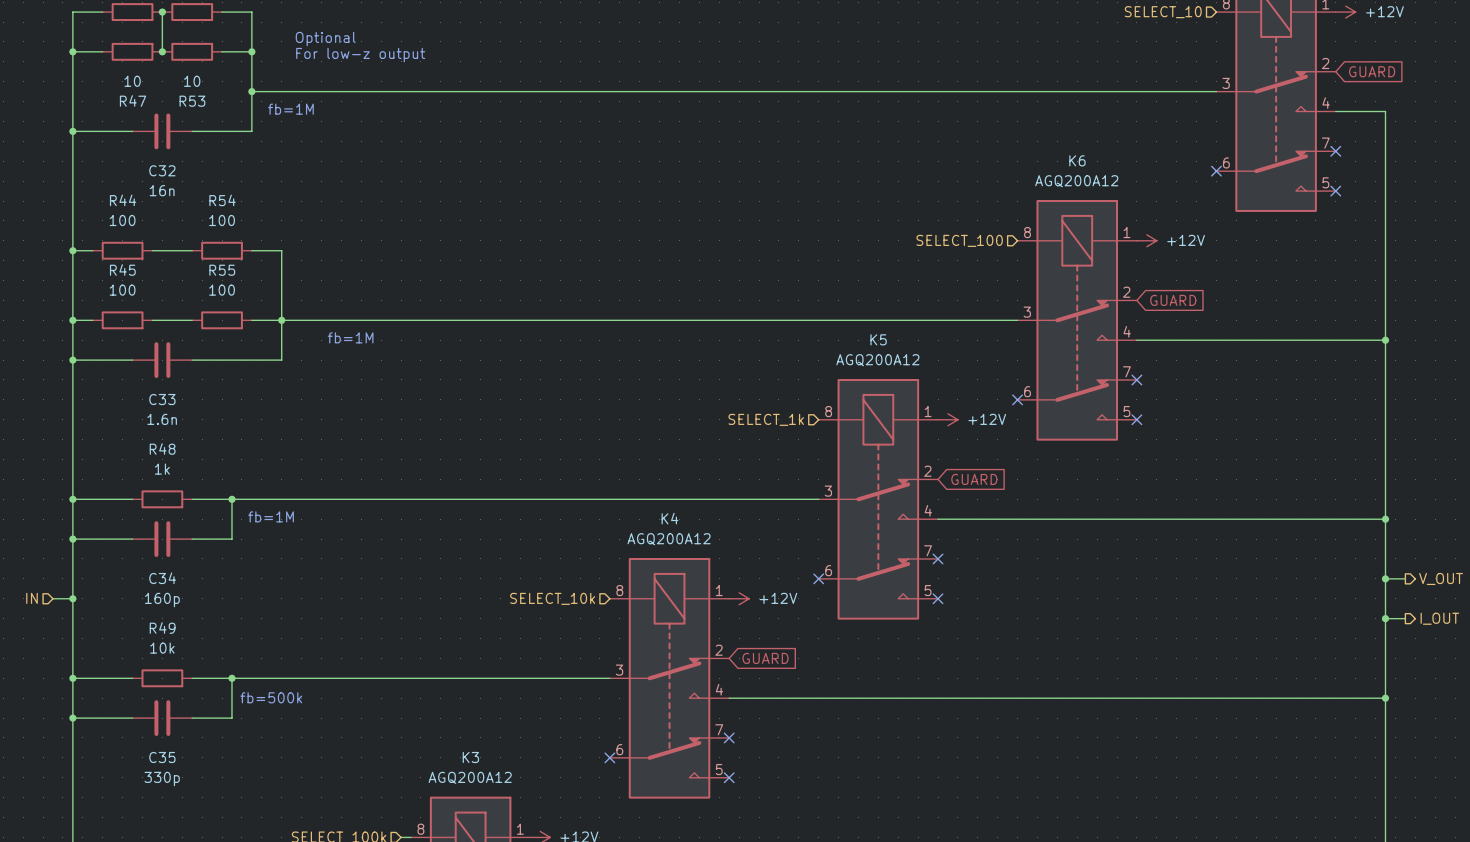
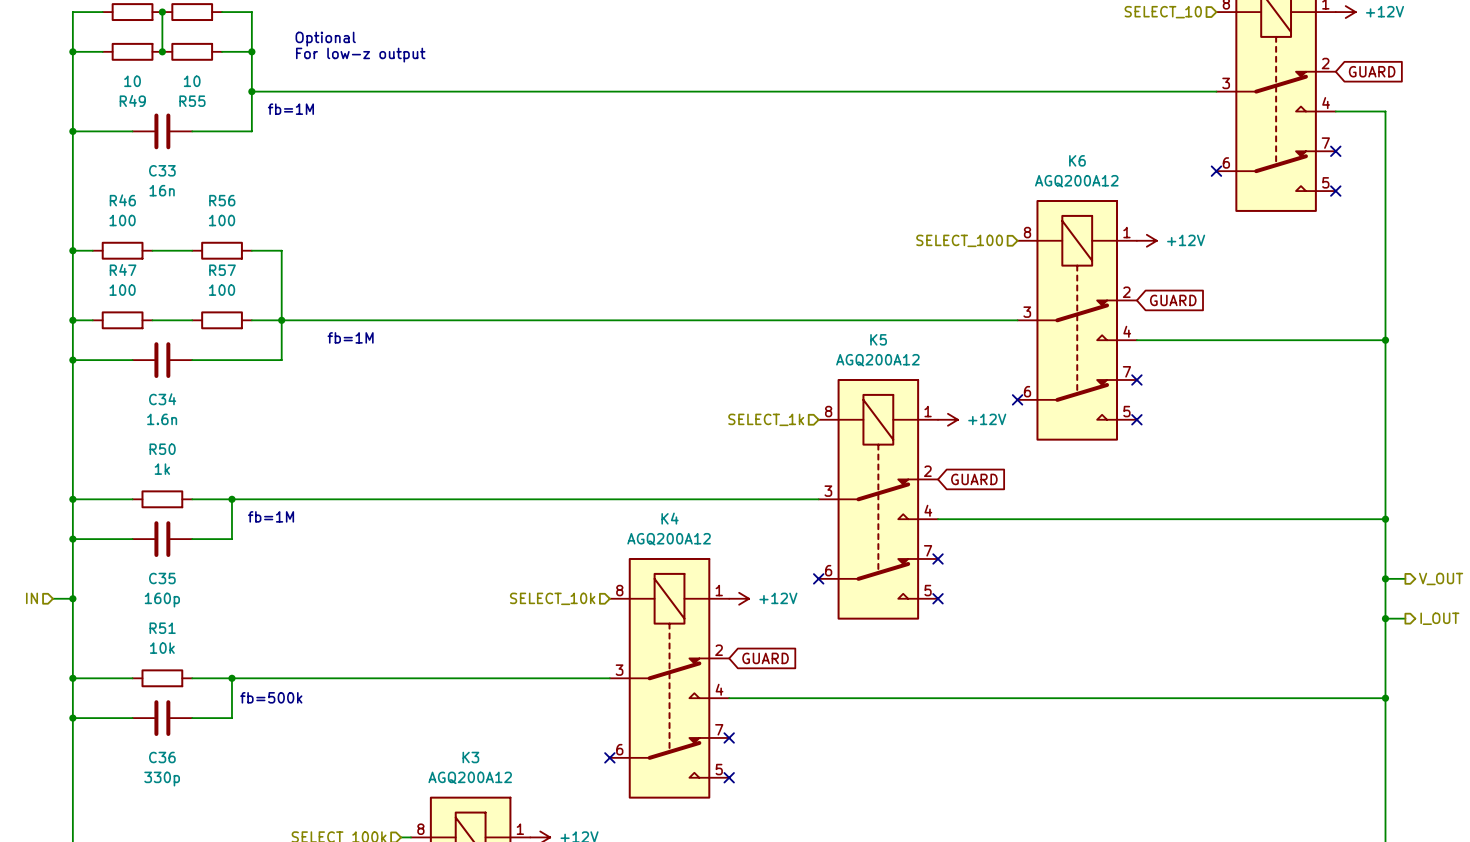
R47 name: R47 (133, 100) -> R49 (132, 100)
R53 name: R53 (192, 101) -> R55 (192, 101)
C32 name: C32 (162, 170) -> C33 (162, 170)
R44 name: R44 (123, 200) -> R46 (122, 200)
R54 name: R54 (222, 200) -> R56 (222, 200)
R45 name: R45 (122, 270) -> R47 (123, 270)
R55 name: R55 (222, 270) -> R57 (222, 270)
C33 name: C33 (162, 399) -> C34 (162, 399)
R48 name: R48 (162, 448) -> R50 (162, 449)
C34 name: C34 (162, 578) -> C35 (162, 578)
R49 name: R49 (162, 627) -> R51 (162, 628)
C35 name: C35 (162, 757) -> C36 (162, 757)

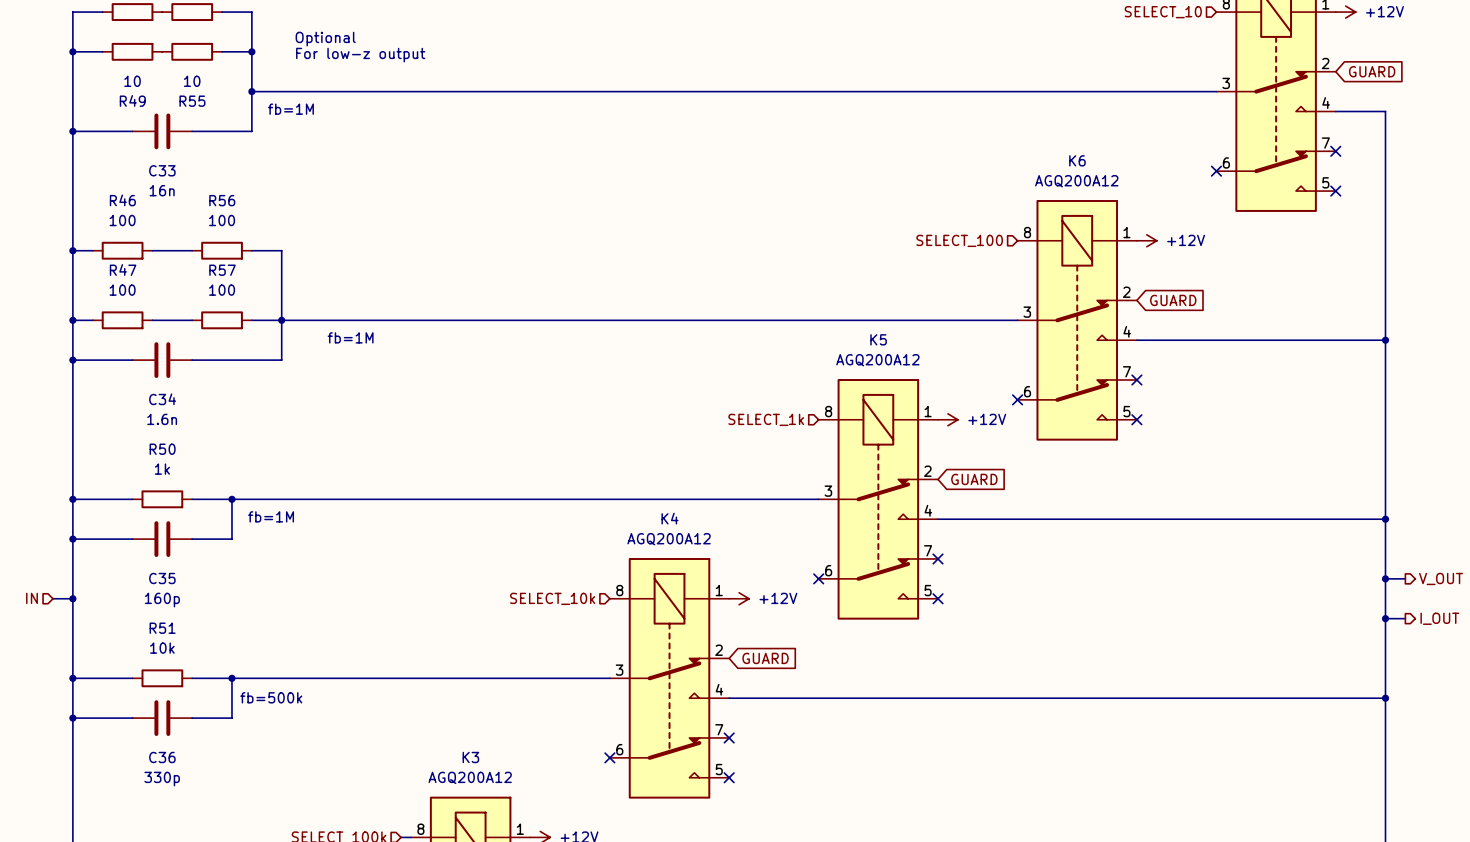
wire: (162, 12) (162, 51) -> none
junction: (162, 12) -> none
junction: (162, 51) -> none

